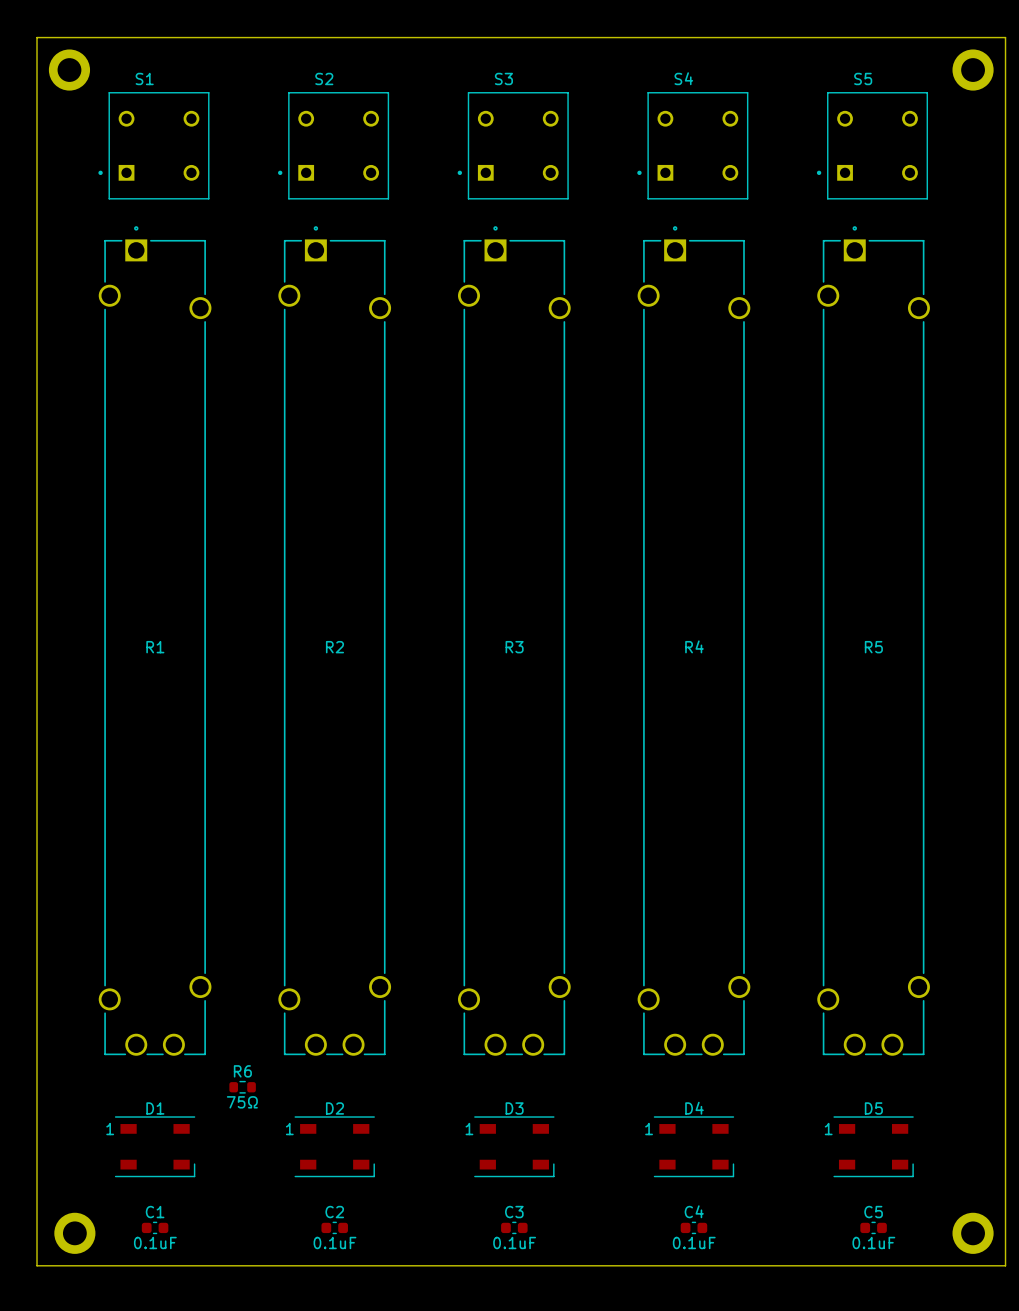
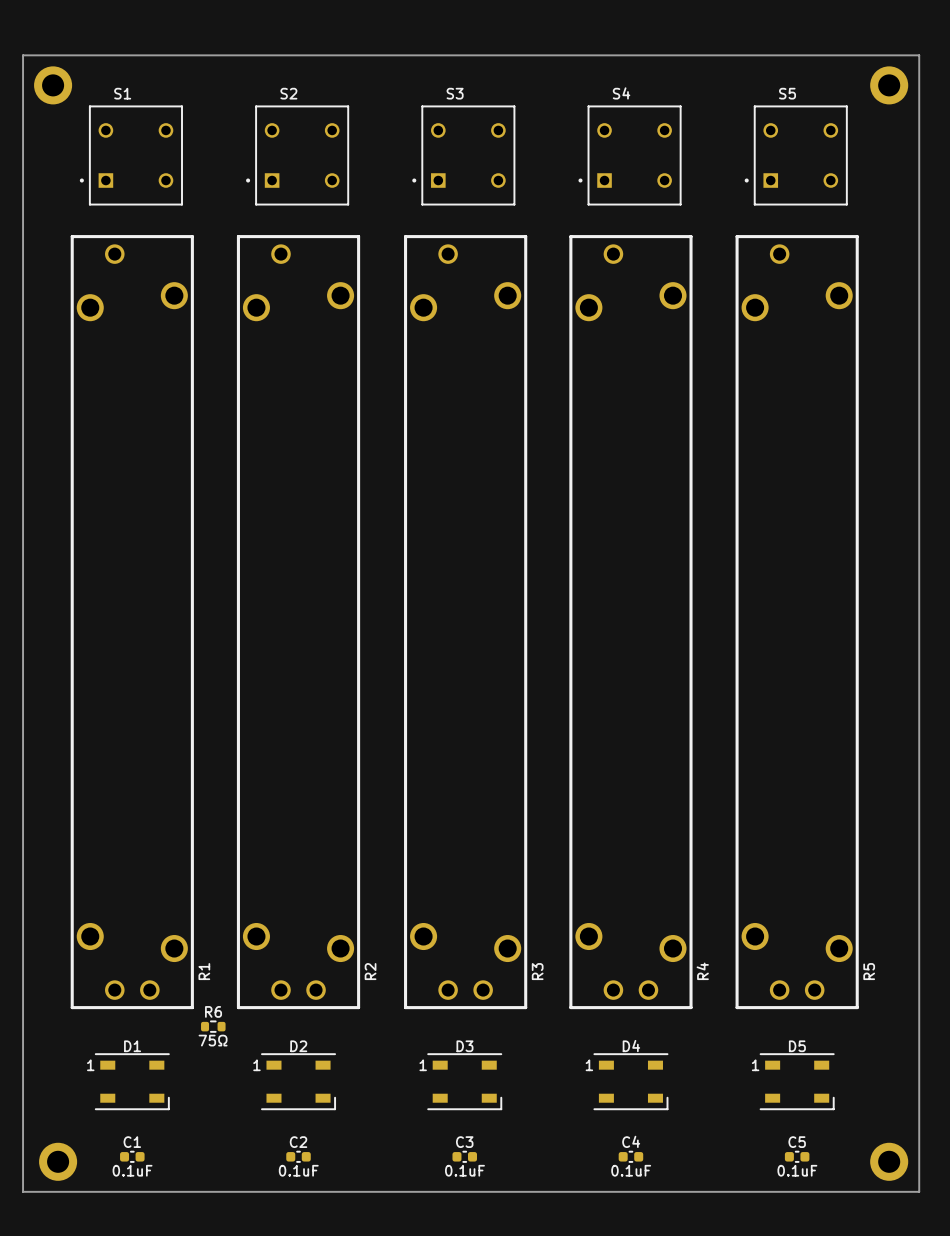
R1 footprint: [98, 226, 212, 1056] -> [70, 235, 194, 1010]
R2 footprint: [278, 226, 392, 1056] -> [236, 235, 361, 1010]
R3 footprint: [457, 226, 571, 1056] -> [404, 235, 528, 1010]
R4 footprint: [637, 226, 751, 1056] -> [569, 235, 693, 1010]
R5 footprint: [817, 226, 930, 1056] -> [735, 235, 859, 1010]
R4 name position: R4 (694, 646) -> R4 (702, 971)
R1 name position: R1 (155, 647) -> R1 (204, 971)
R2 name position: R2 (334, 647) -> R2 (370, 971)
R3 name position: R3 (514, 647) -> R3 (537, 971)
R5 name position: R5 (873, 647) -> R5 (869, 971)

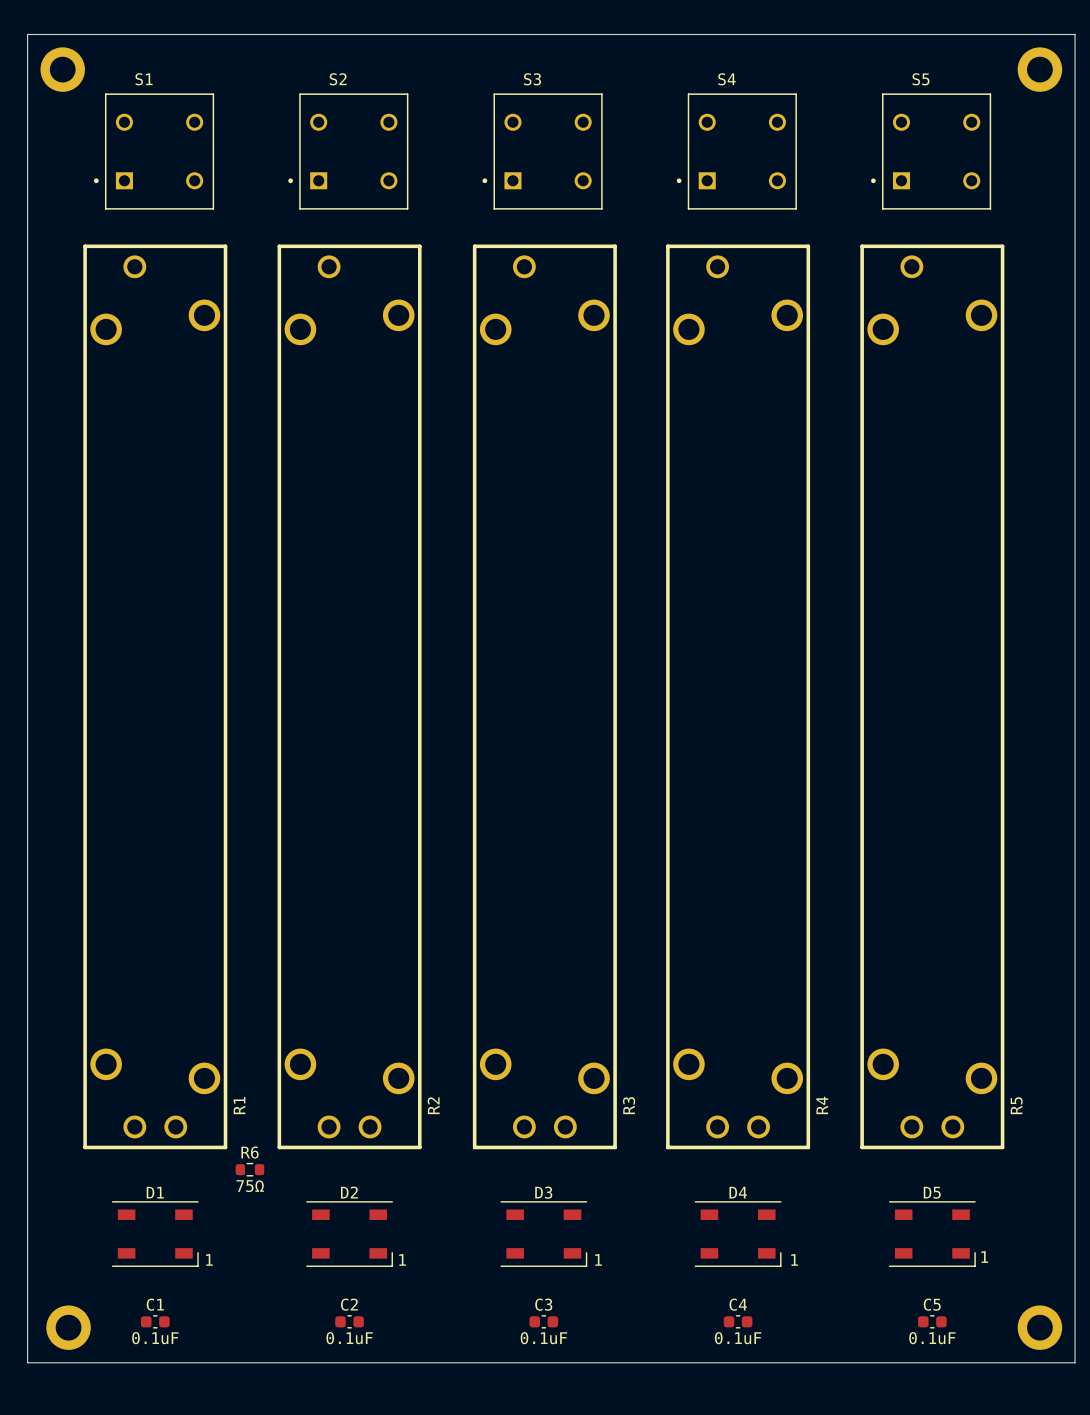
D1 text position: 1 (90, 1065) -> 1 (209, 1259)
D2 text position: 1 (256, 1065) -> 1 (402, 1259)
D3 text position: 1 (423, 1065) -> 1 (598, 1259)
D4 text position: 1 (589, 1065) -> 1 (794, 1259)
D5 text position: 1 (755, 1065) -> 1 (984, 1257)

